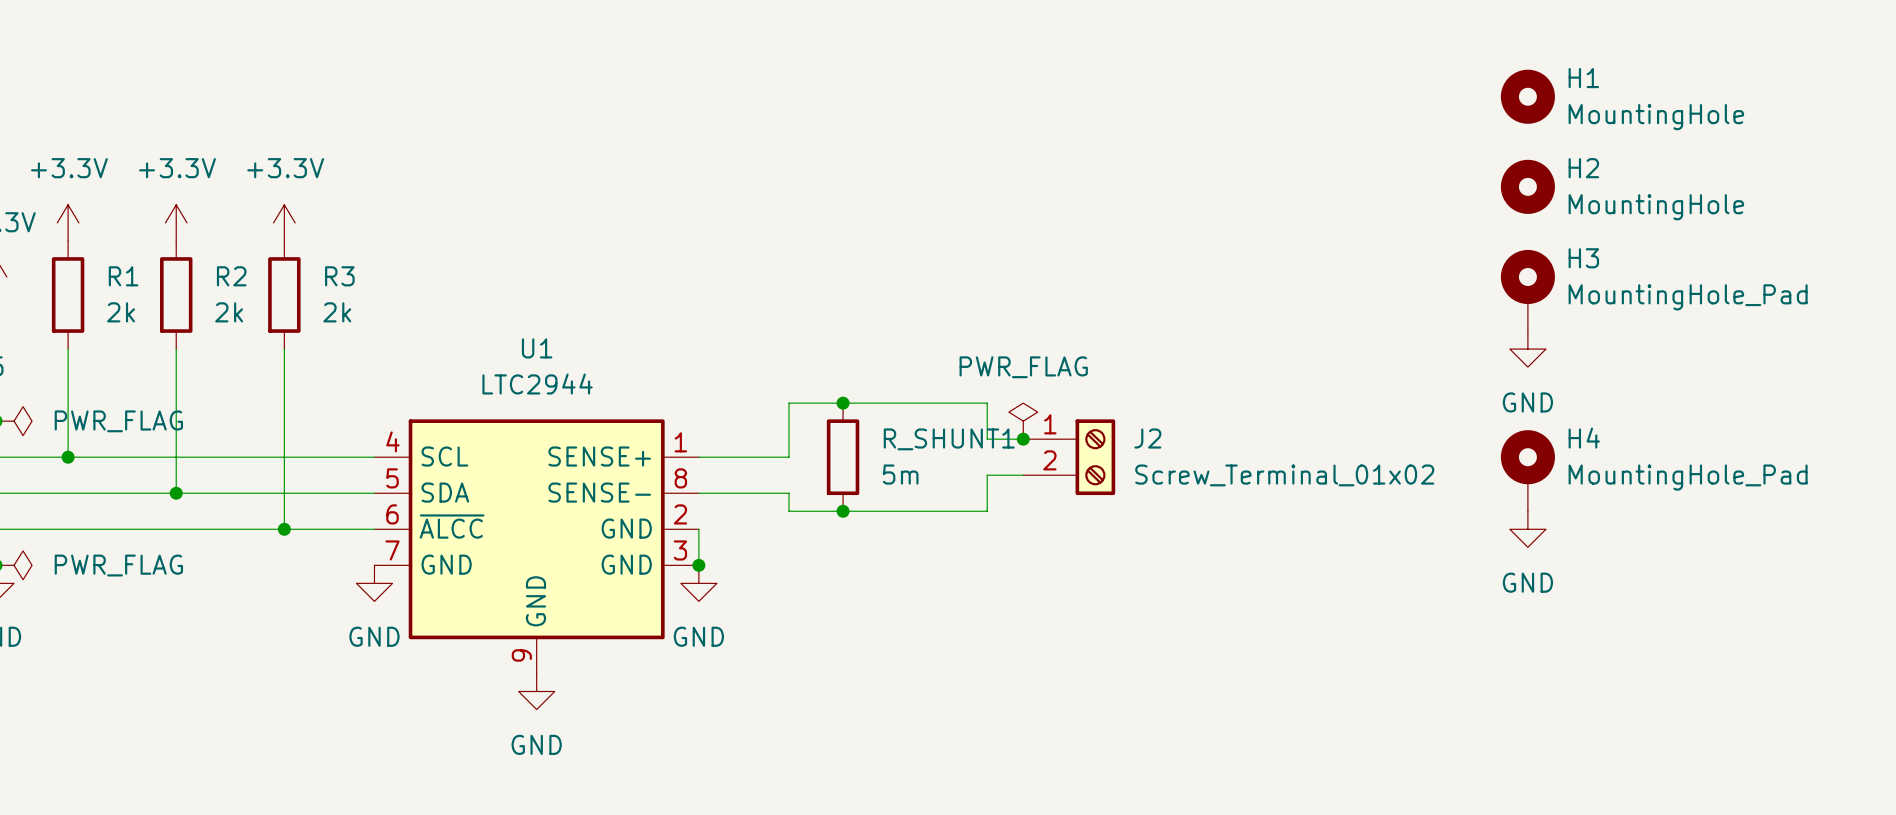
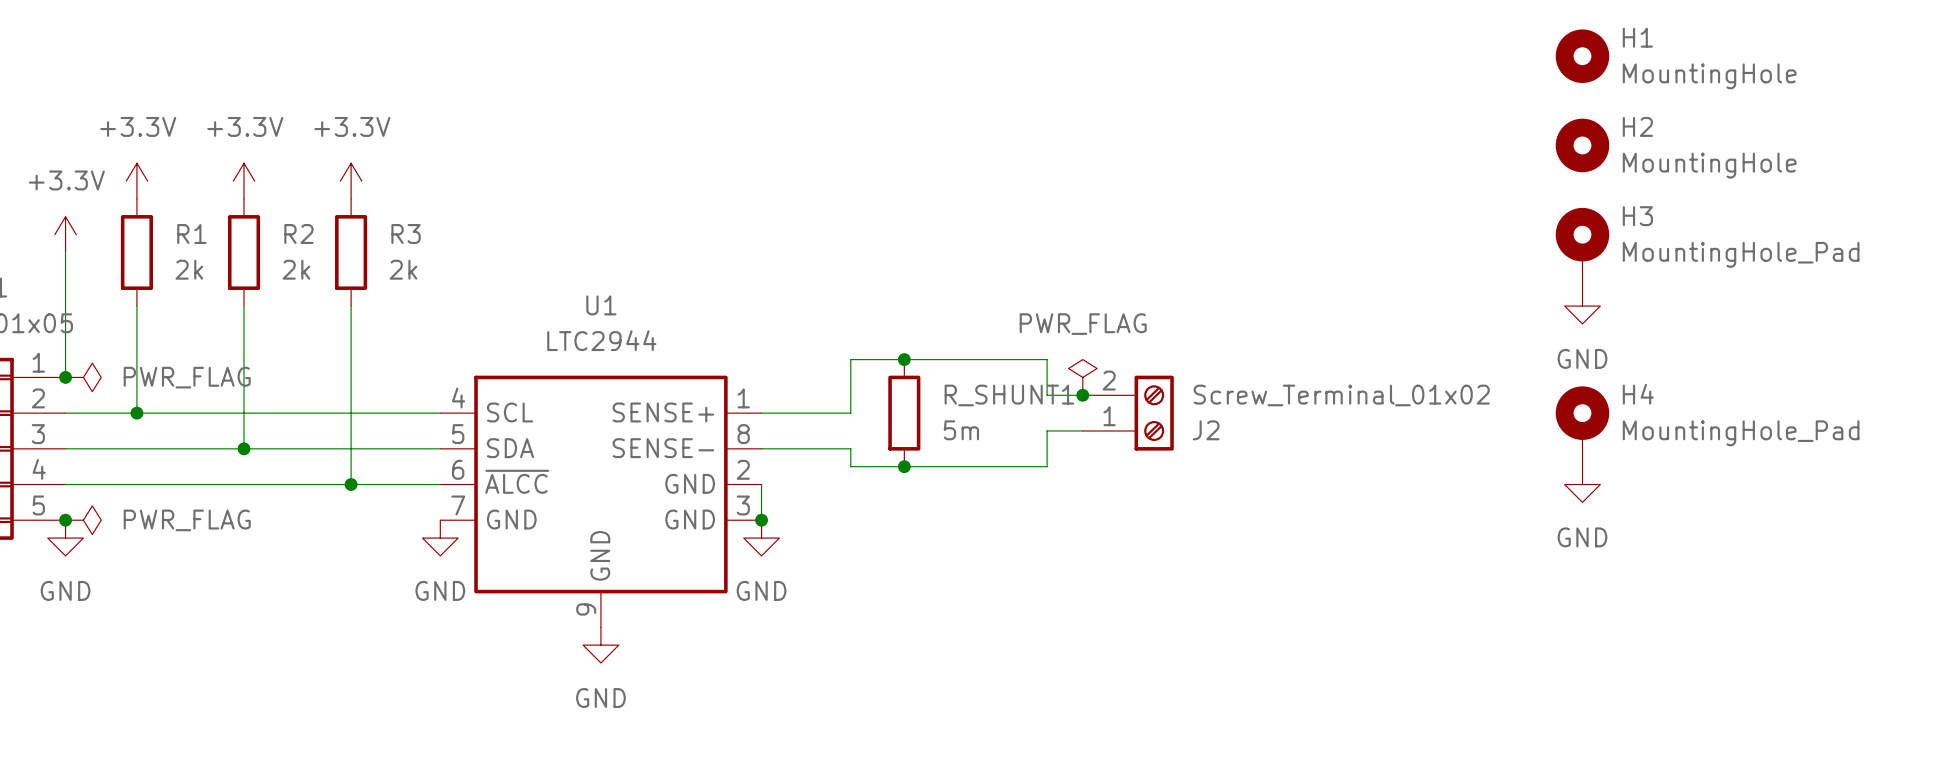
J2 flip: as is (1095, 457) -> up-down (1154, 413)

